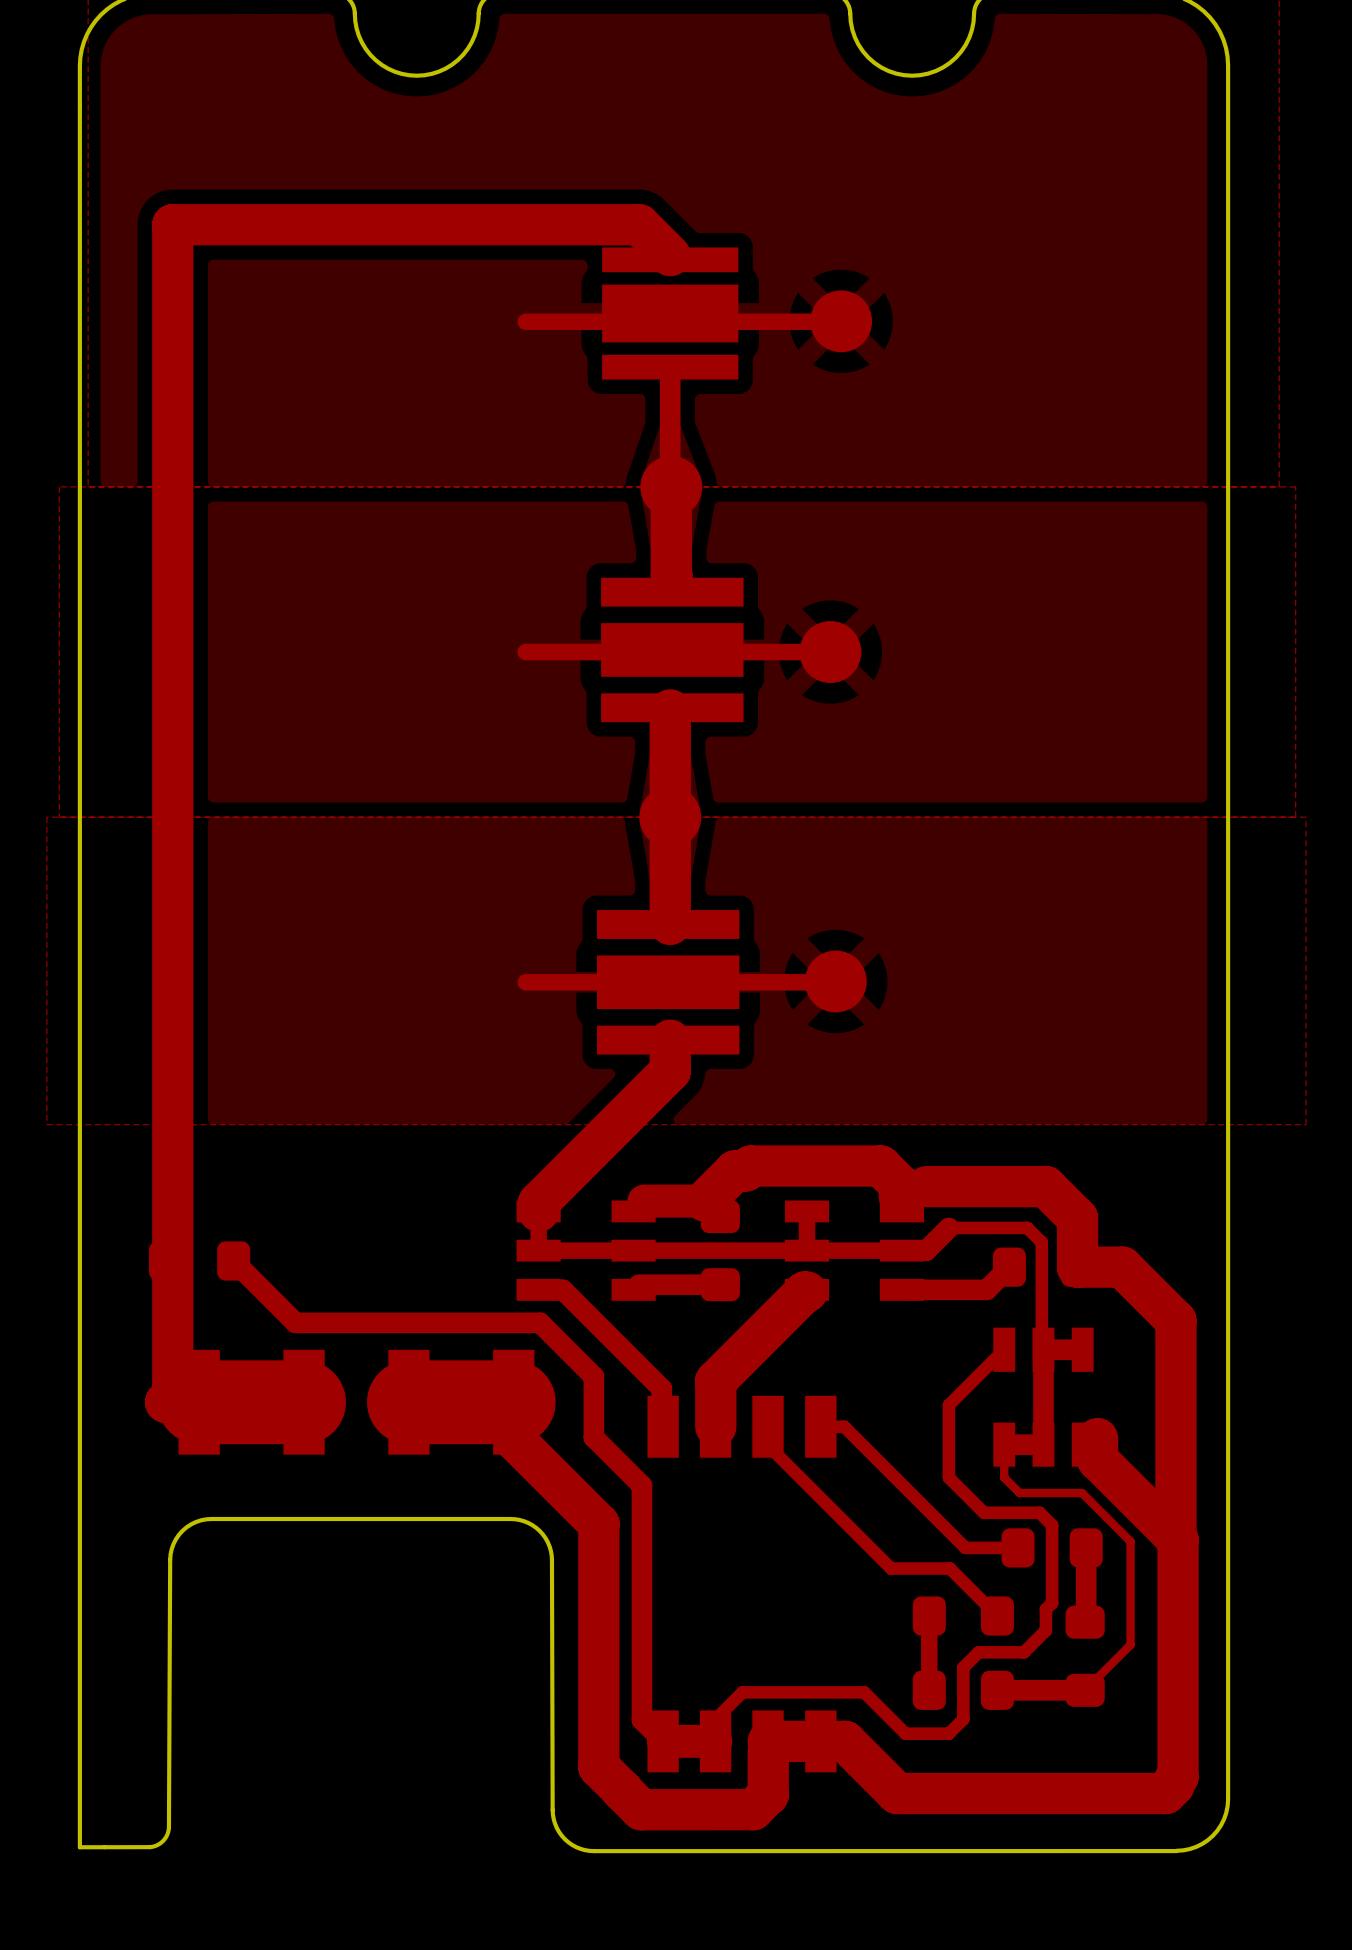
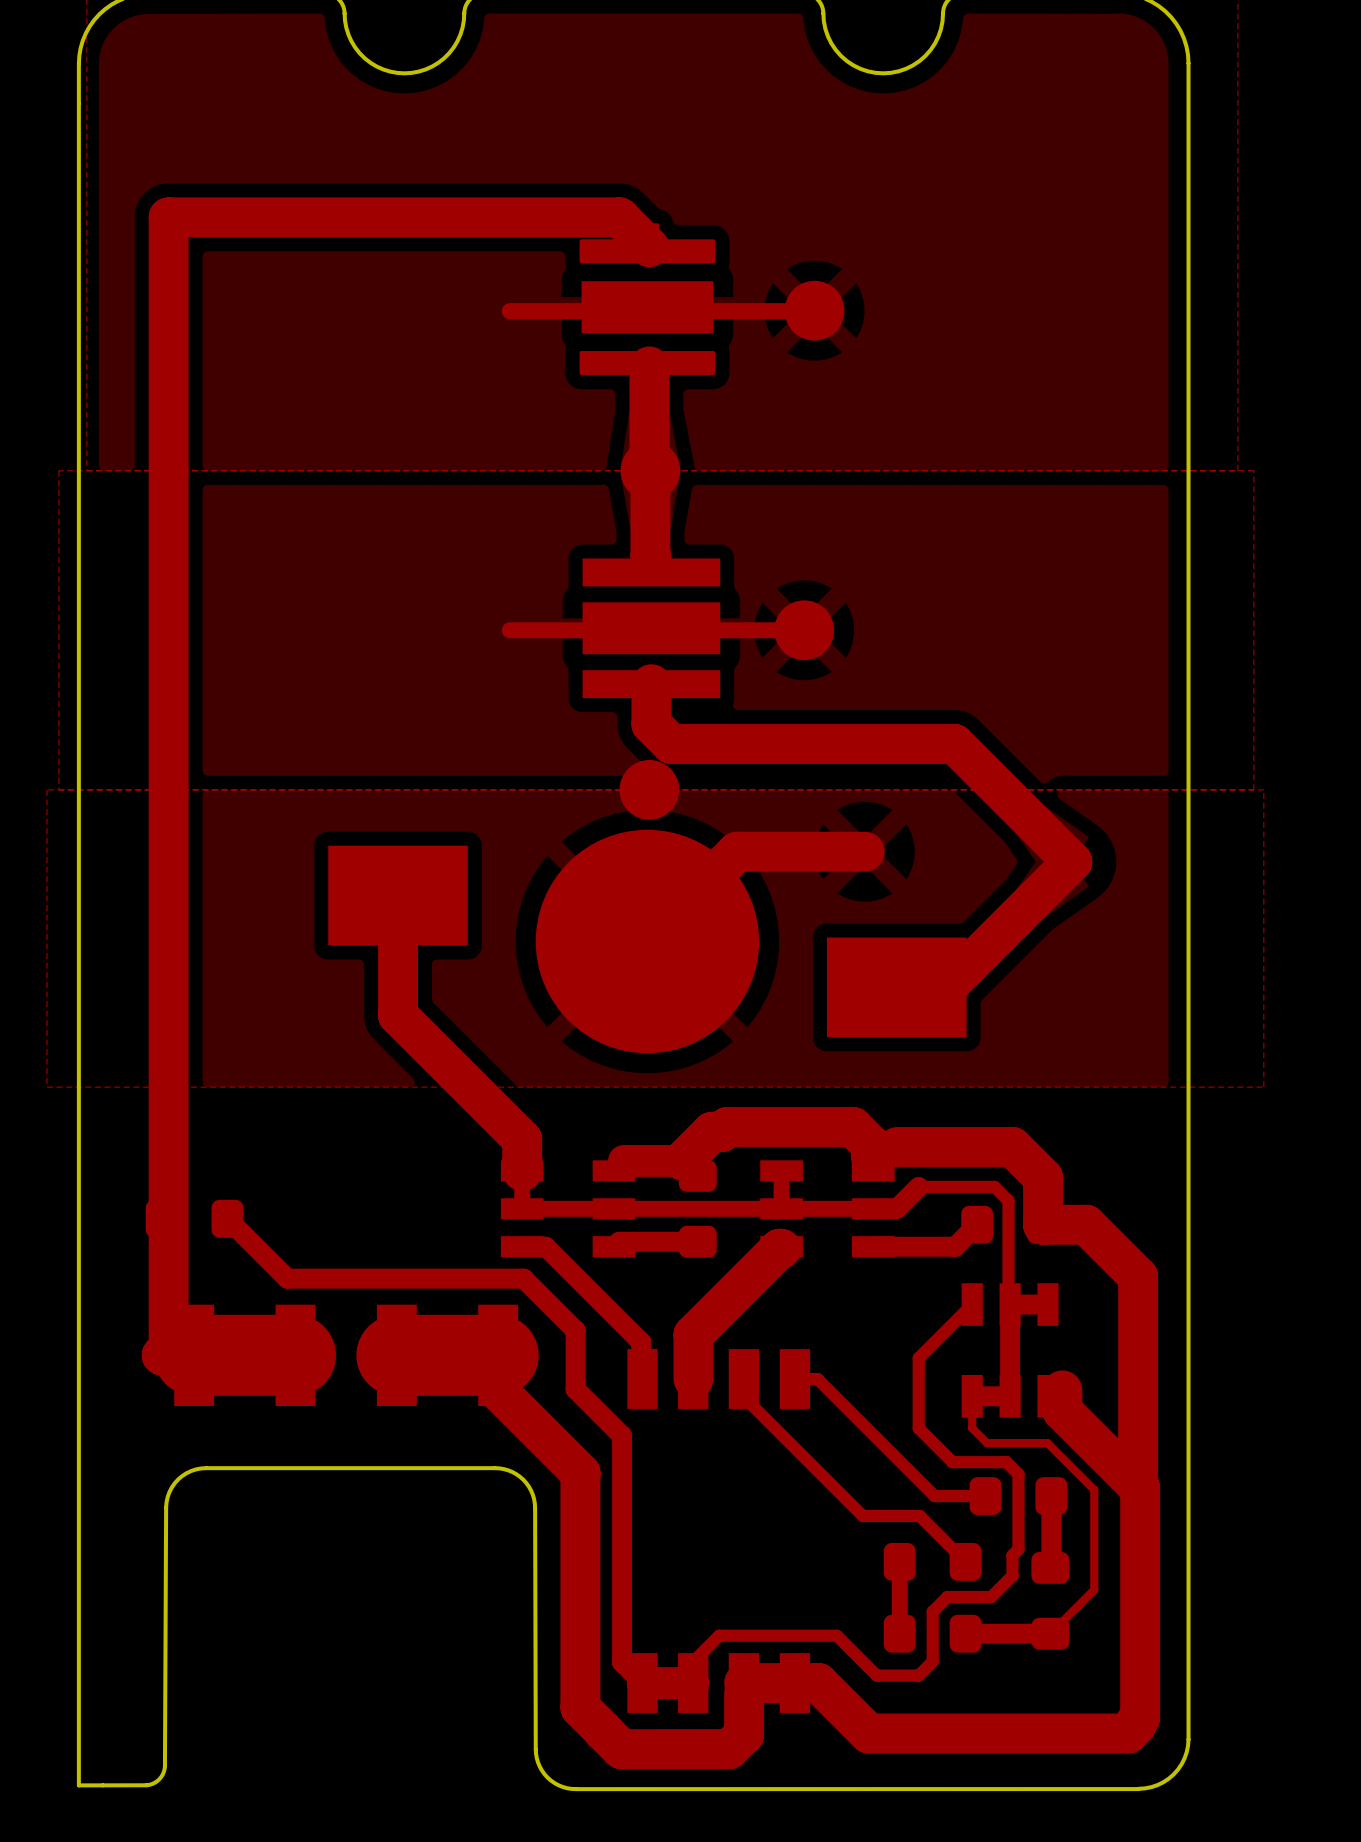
part footprint: [602, 247, 739, 380] -> [579, 223, 716, 391]
top track width: thin (670, 378) (670, 485) -> thick (649, 366) (649, 469)
top track: none -> (651, 684) (651, 724) (671, 744) (954, 744) (1072, 861) (946, 987) (896, 987)
top track: (670, 709) (670, 924) -> none
top track: none -> (864, 851) (737, 851) (647, 941)
part footprint: [596, 910, 740, 1055] -> [328, 829, 967, 1054]
part: (835, 981) -> none
top track: (814, 982) (525, 982) -> none
top track: (670, 1040) (670, 1071) (538, 1202) -> (398, 895) (398, 1015) (522, 1139) (522, 1162)

